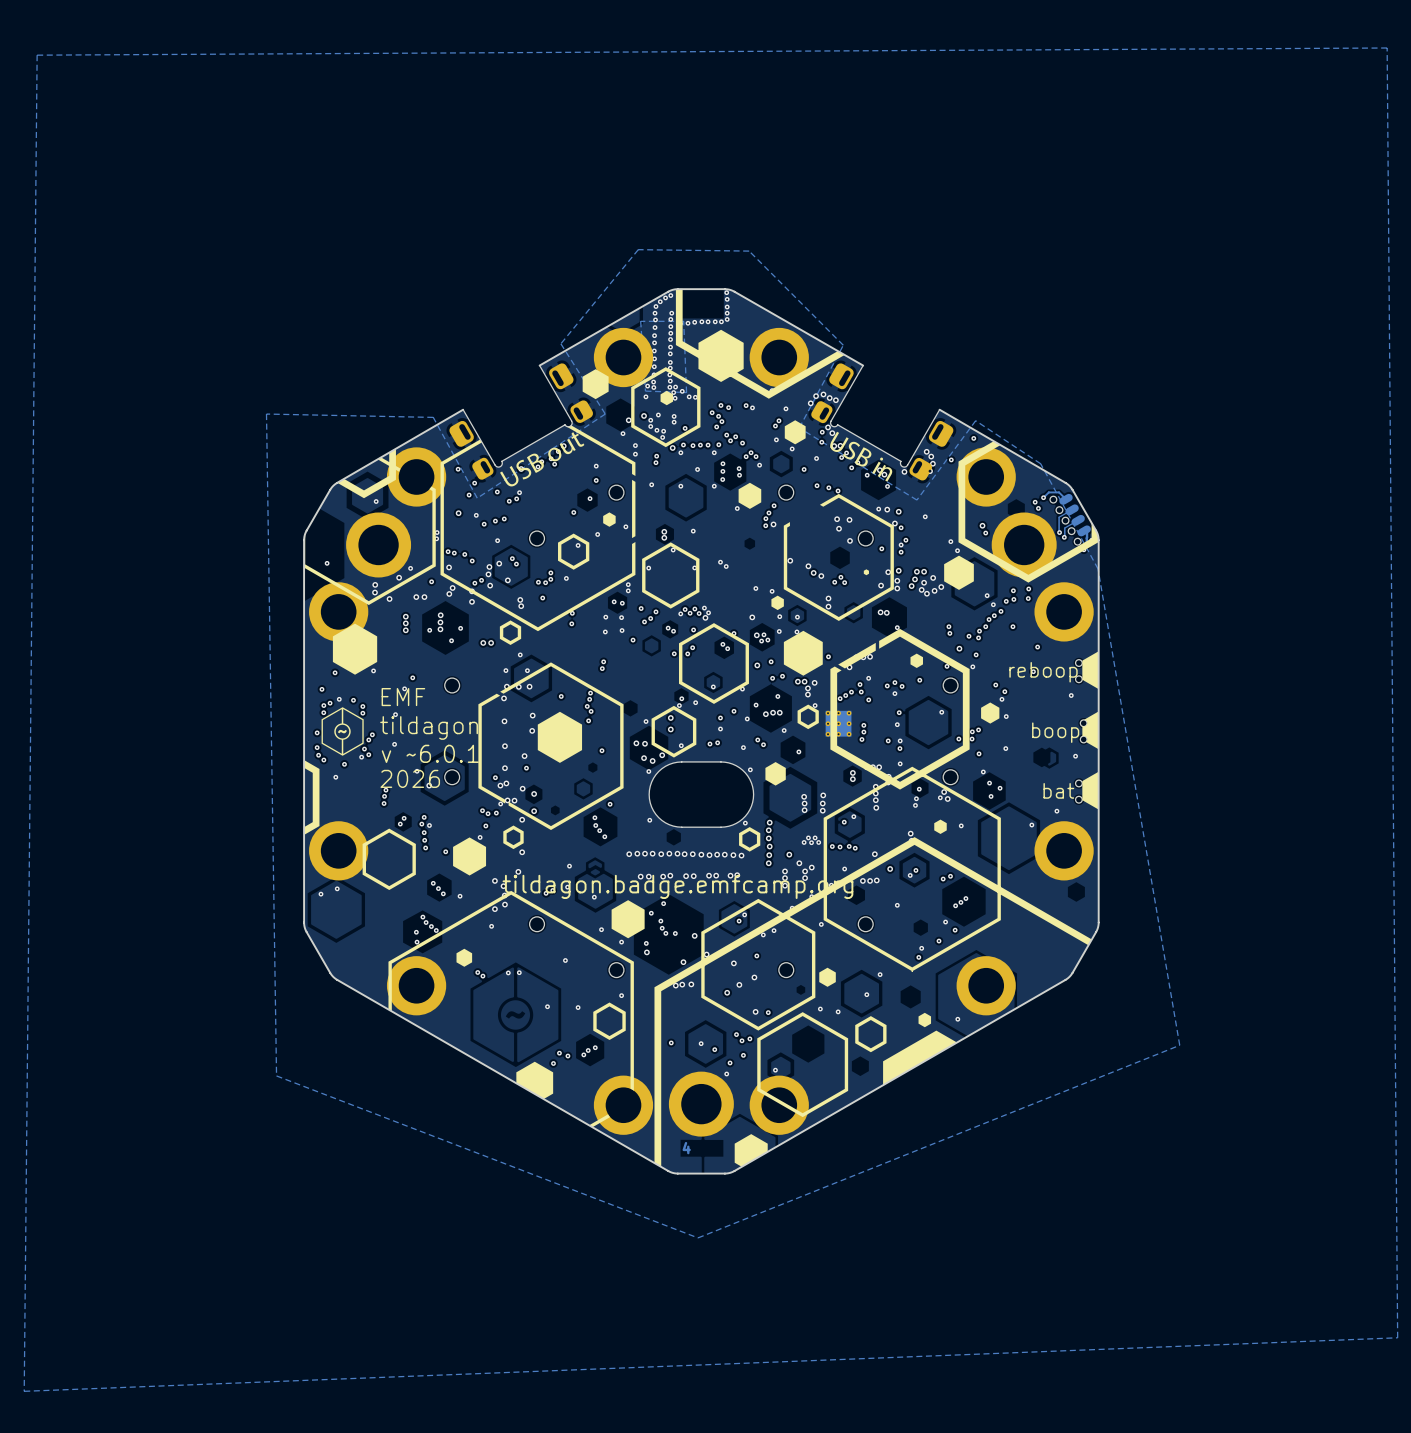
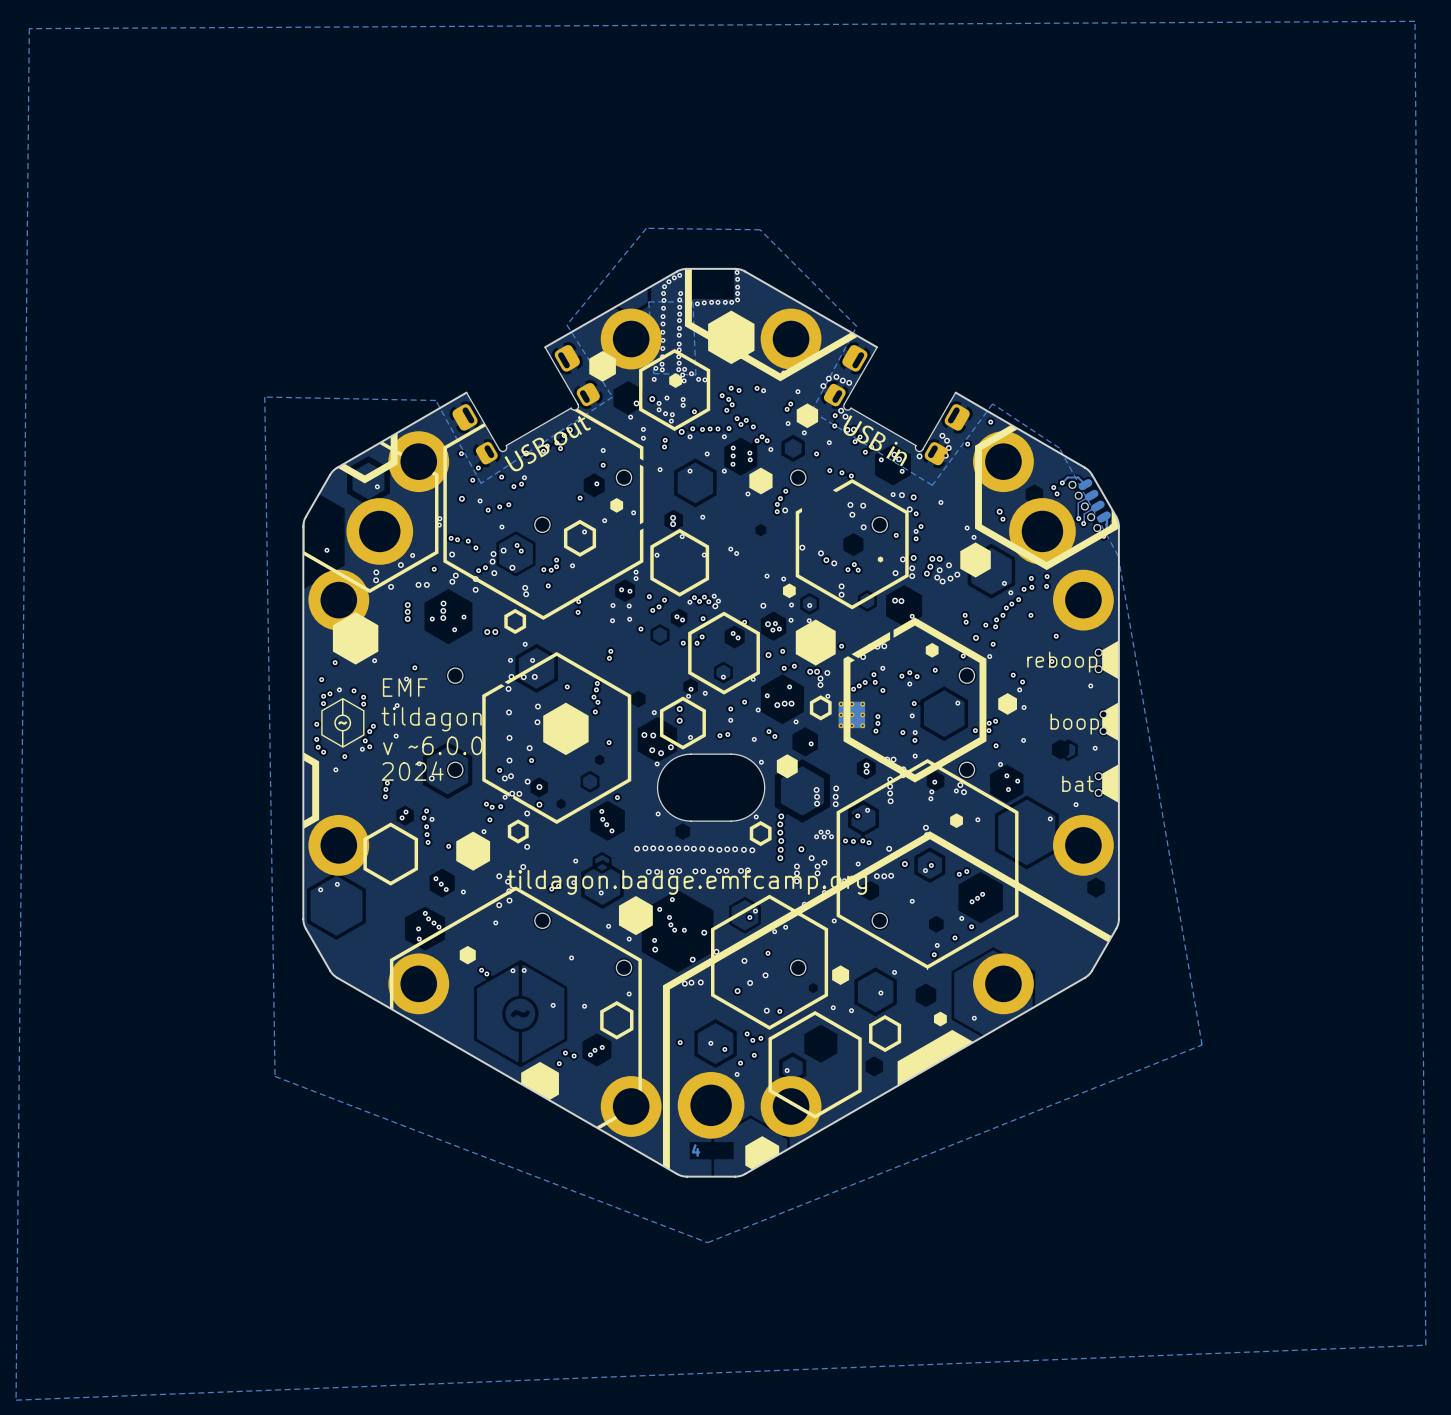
text: v ~6.0.1 (430, 753) -> v ~6.0.0 (432, 745)
text: 2026 (410, 778) -> 2024 (412, 771)

